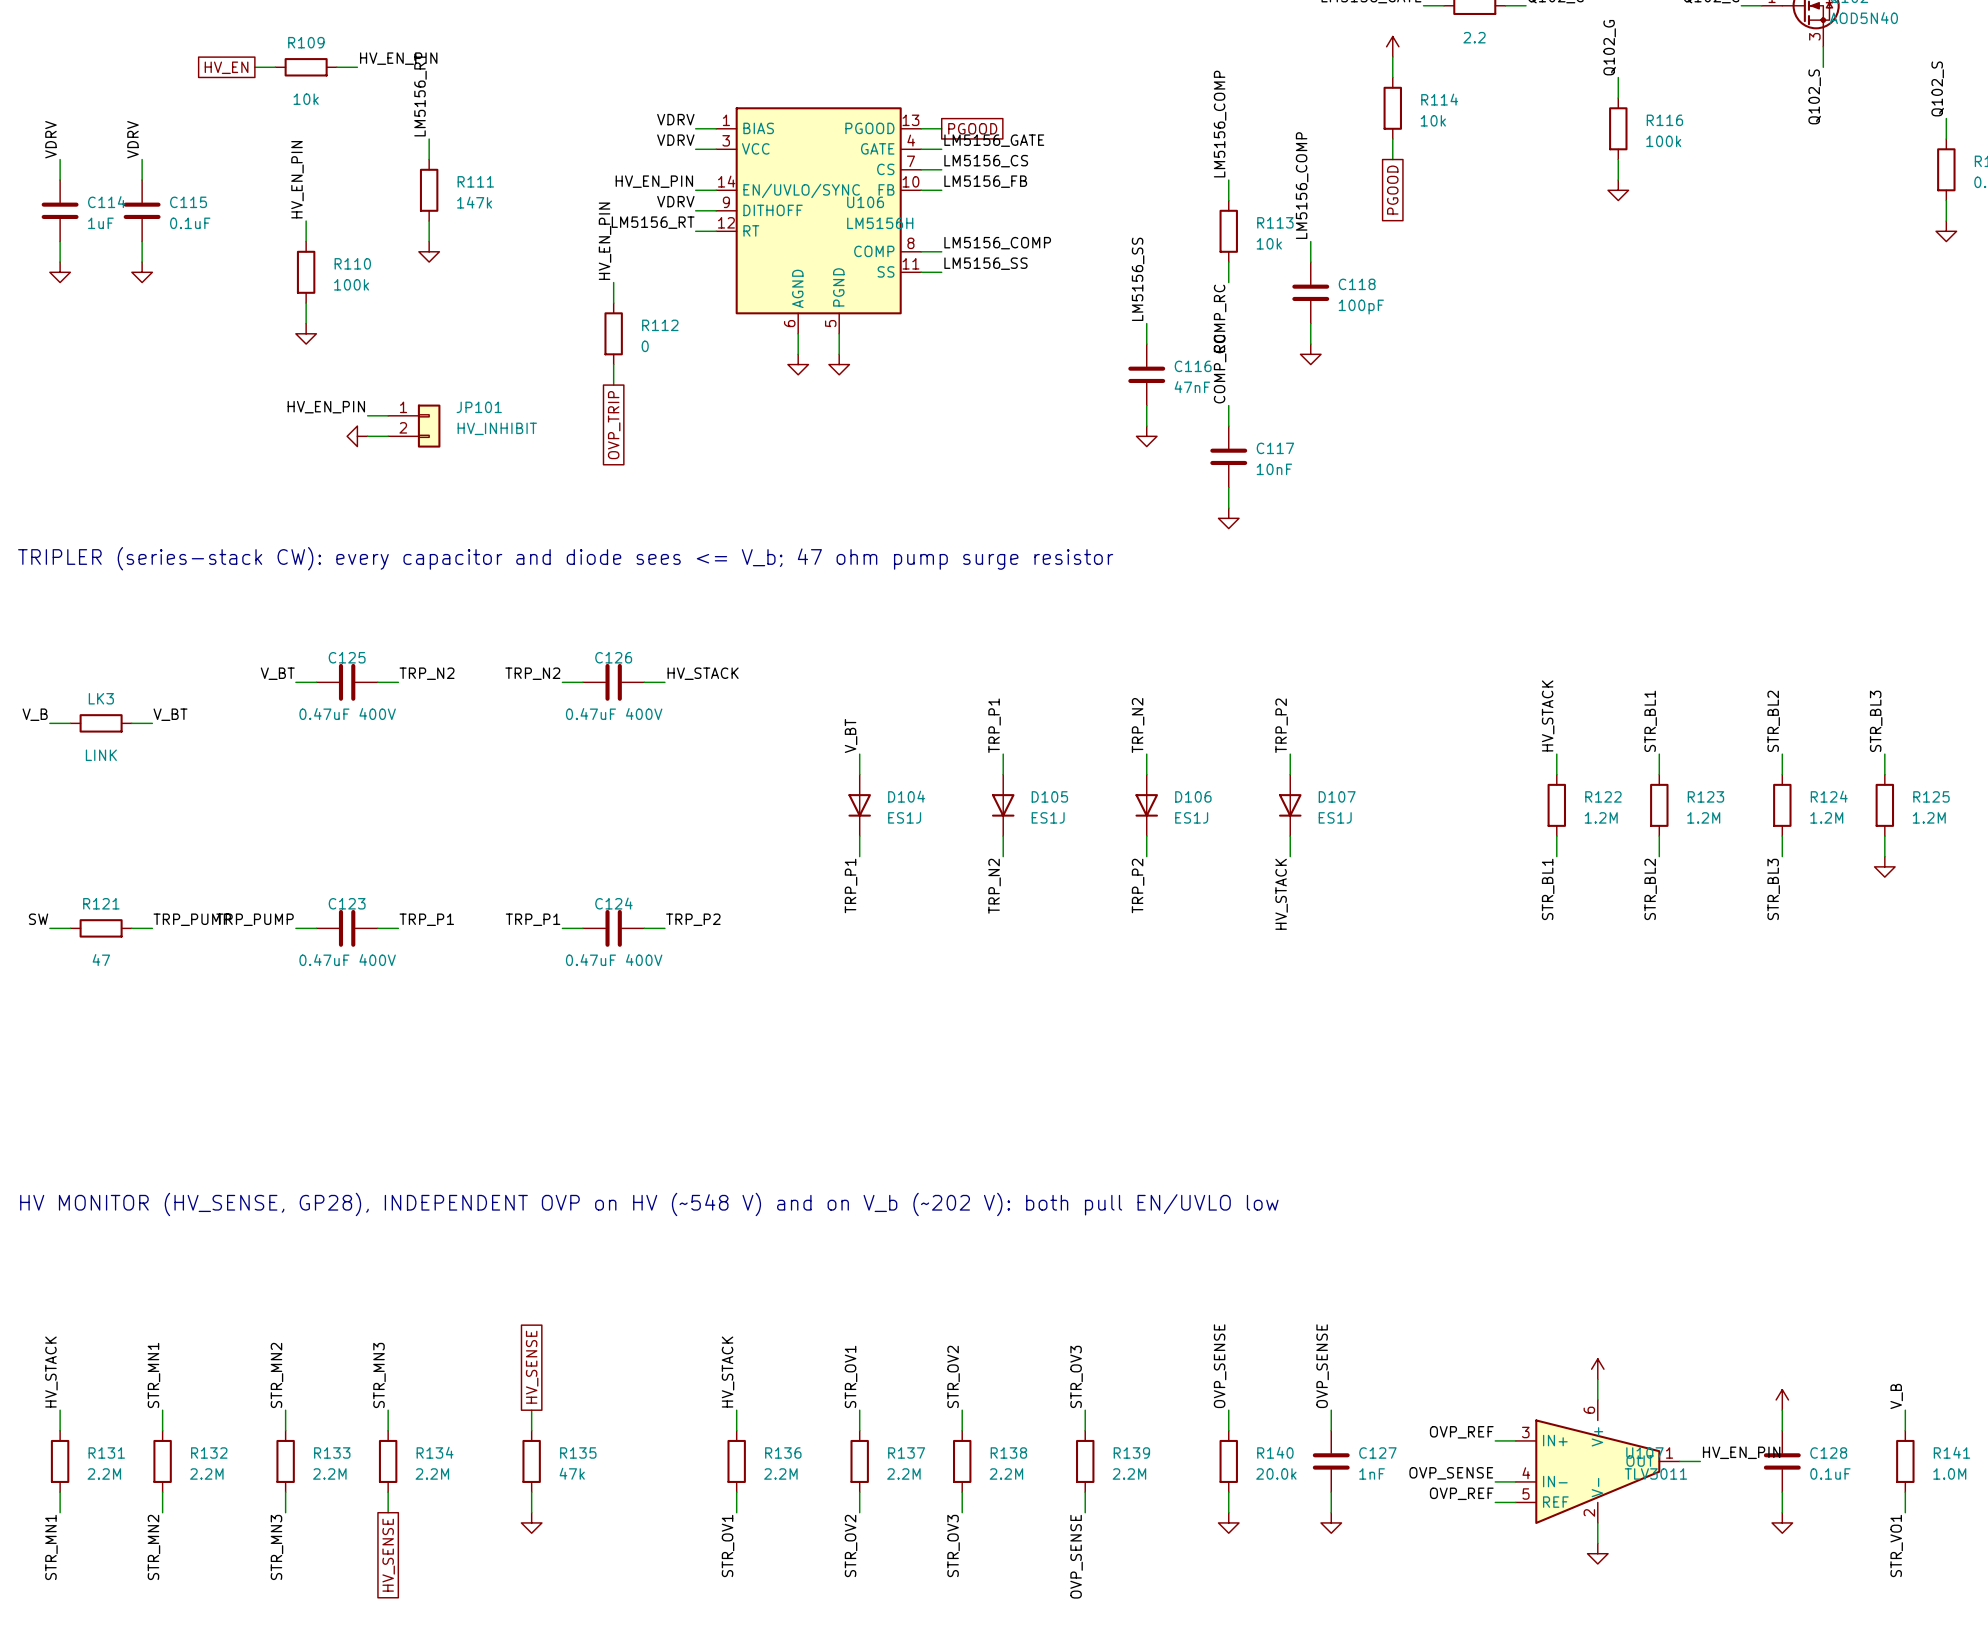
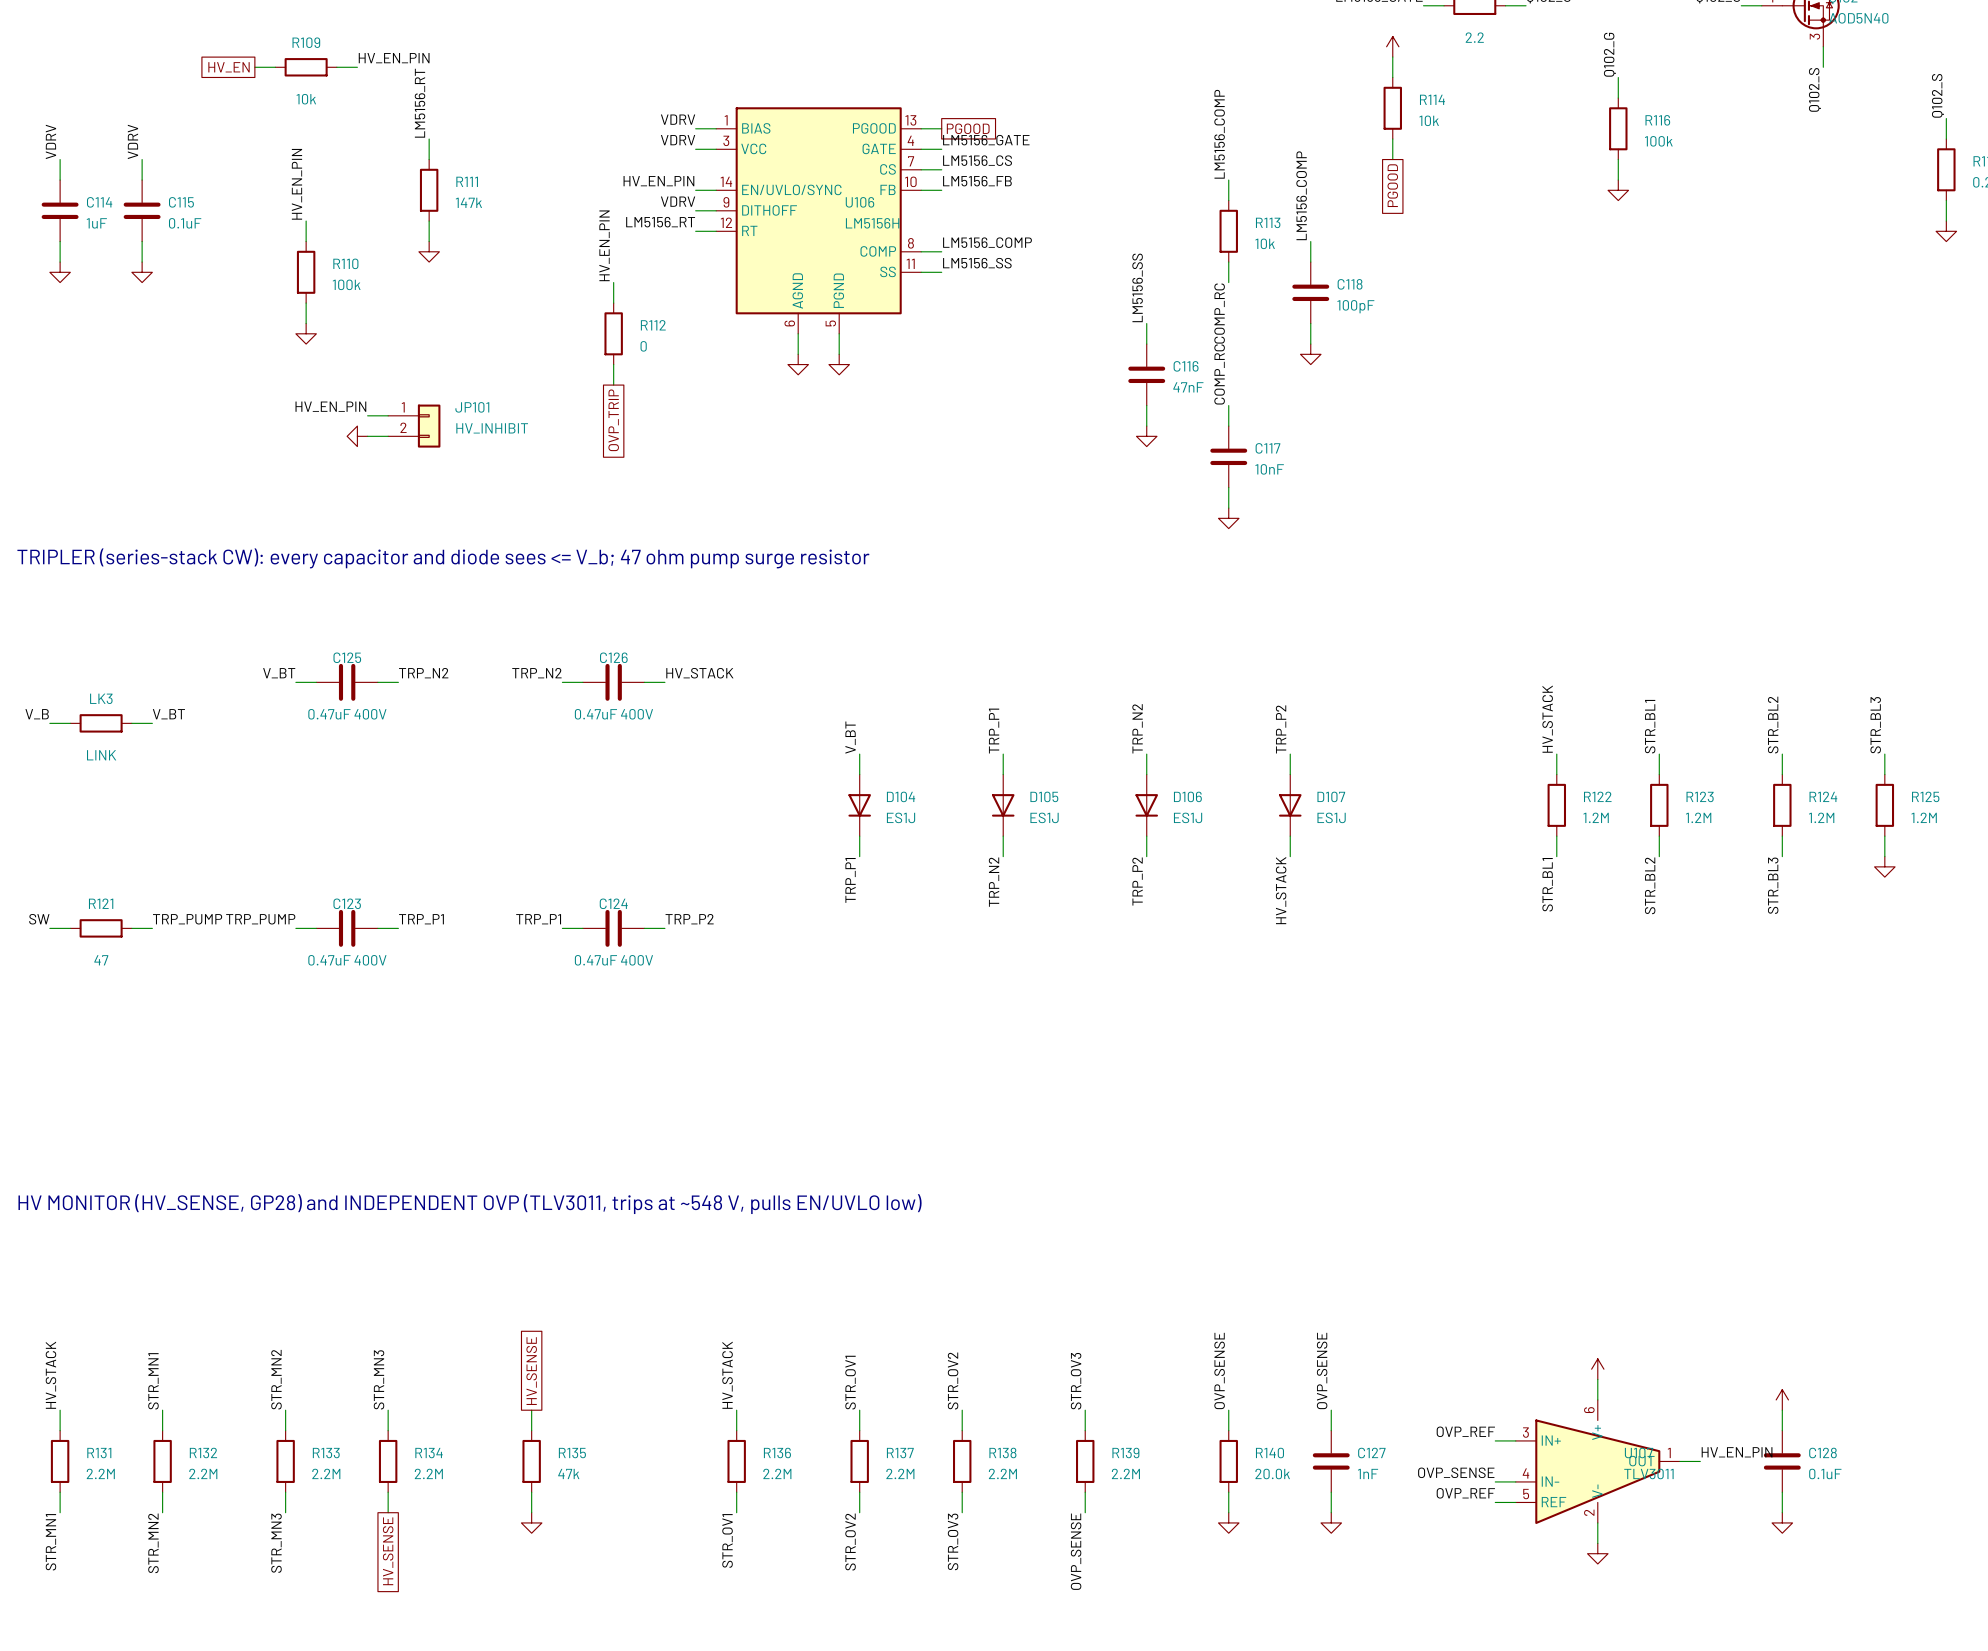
text: HV MONITOR (HV_SENSE, GP28), INDEPENDENT OVP on HV (~548 V) and on V_b (~202 V): both pull EN/UVLO low (649, 1204) -> HV MONITOR (HV_SENSE, GP28) and INDEPENDENT OVP (TLV3011, trips at ~548 V, pulls EN/UVLO low) (470, 1204)
label: V_B (1896, 1396) -> none
wire: (1905, 1410) (1905, 1430) -> none
R141: 1.0M (1905, 1461) -> none
wire: (1905, 1492) (1905, 1512) -> none
label: STR_VO1 (1896, 1545) -> none

